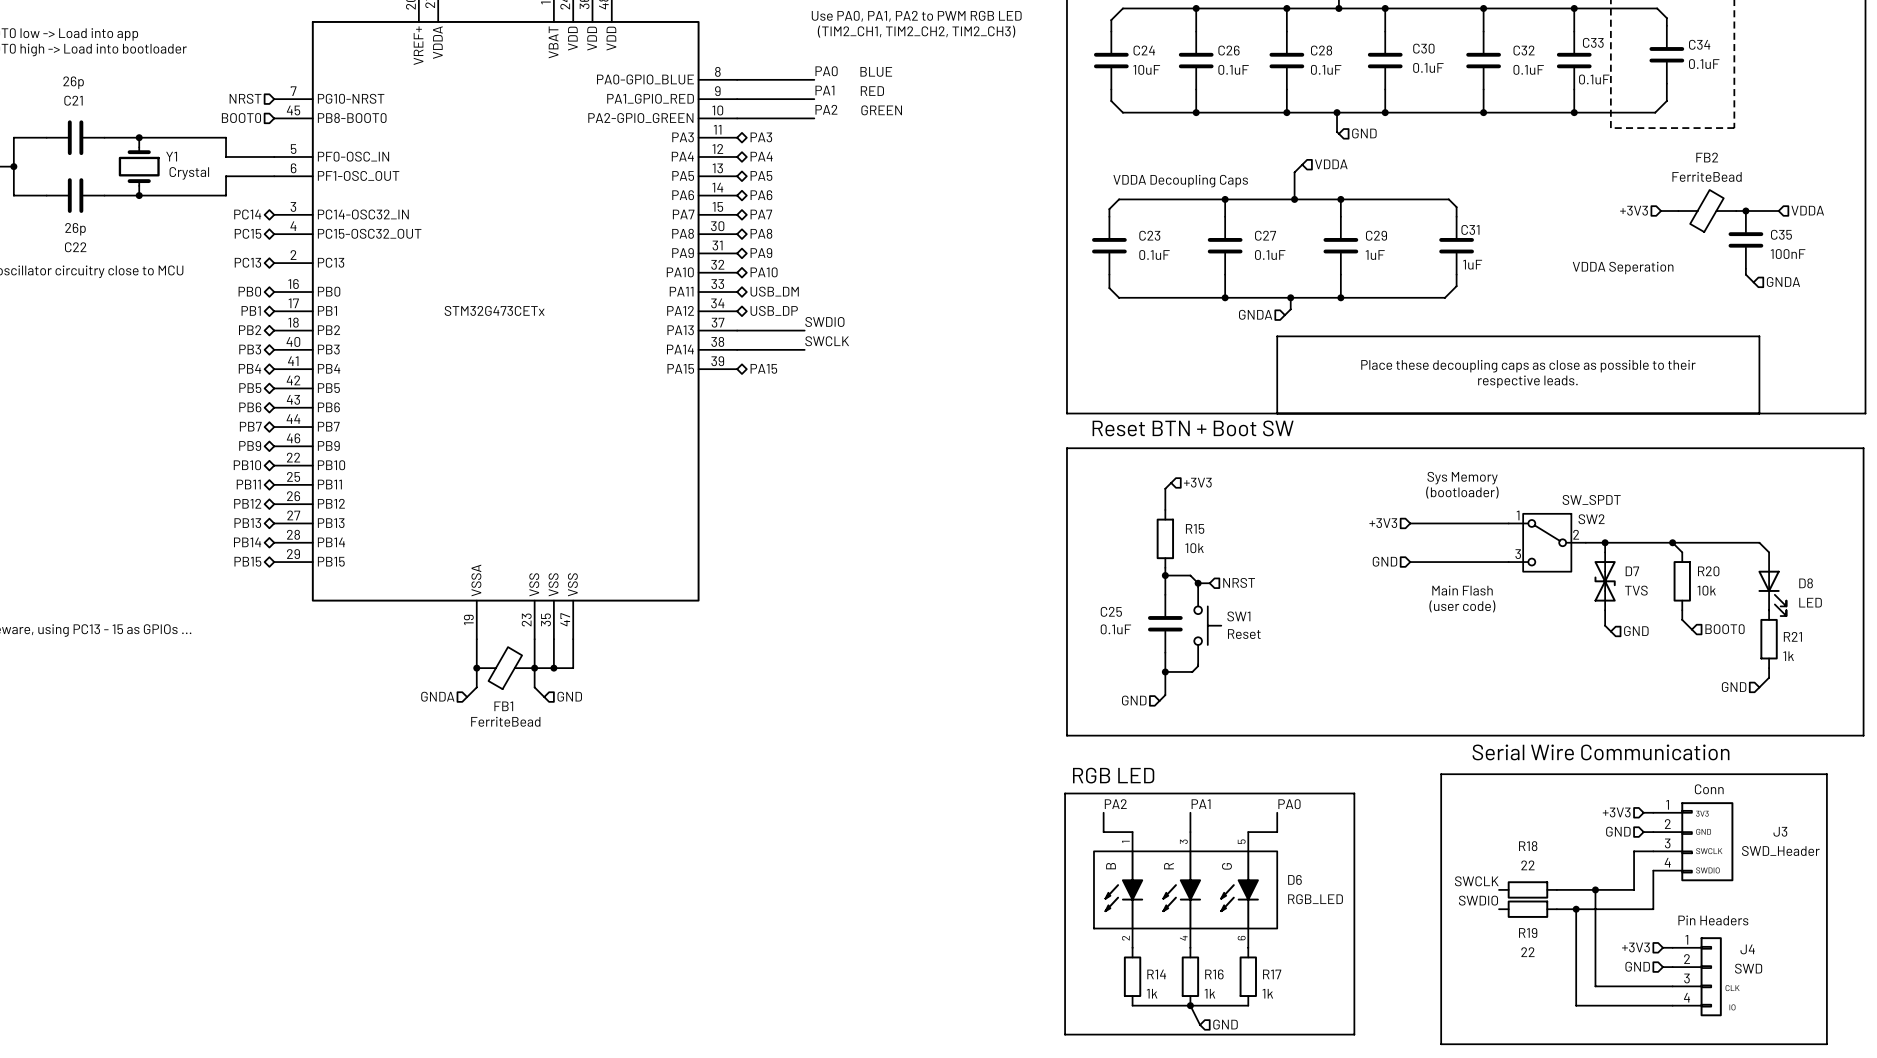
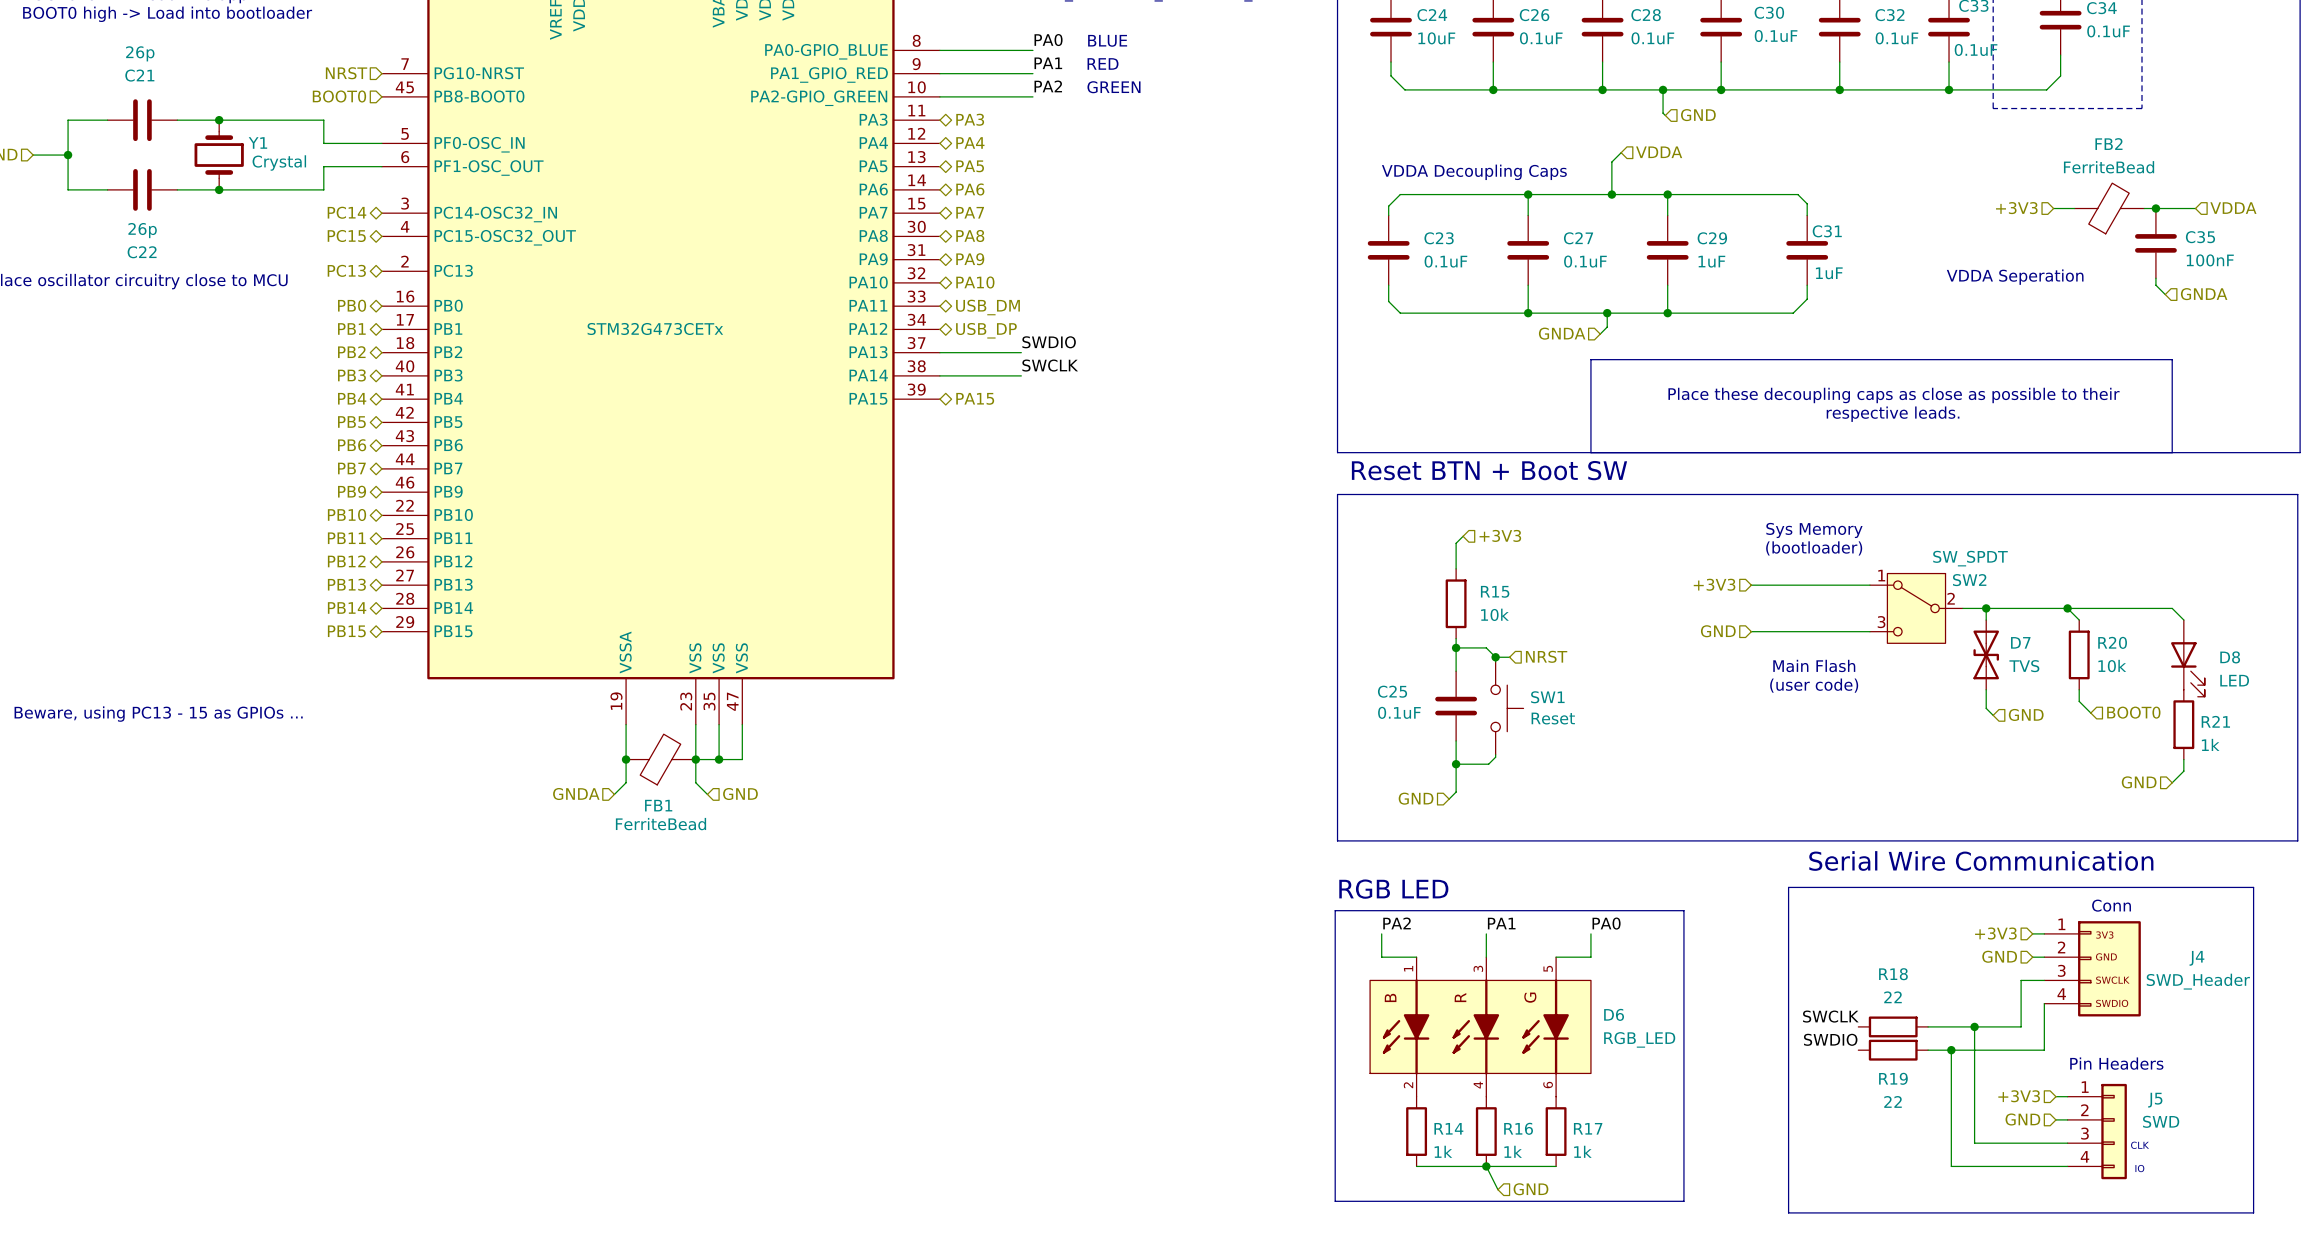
J3 name: J3 (1780, 831) -> J4 (2196, 958)
J4 name: J4 (1747, 949) -> J5 (2155, 1100)

